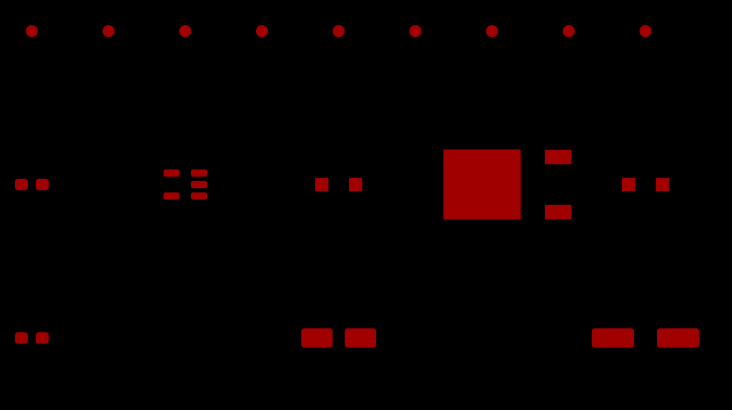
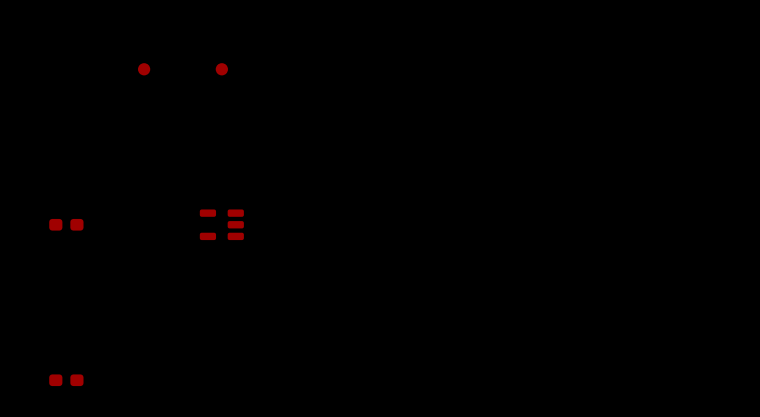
part: (31, 31) -> none
part: (261, 31) -> none
part: (338, 31) -> none
part: (415, 31) -> none
part: (492, 31) -> none
part: (568, 31) -> none
part: (645, 31) -> none
part: (338, 184) -> none
part: (507, 184) -> none
part: (645, 184) -> none
part: (338, 337) -> none
part: (645, 337) -> none

